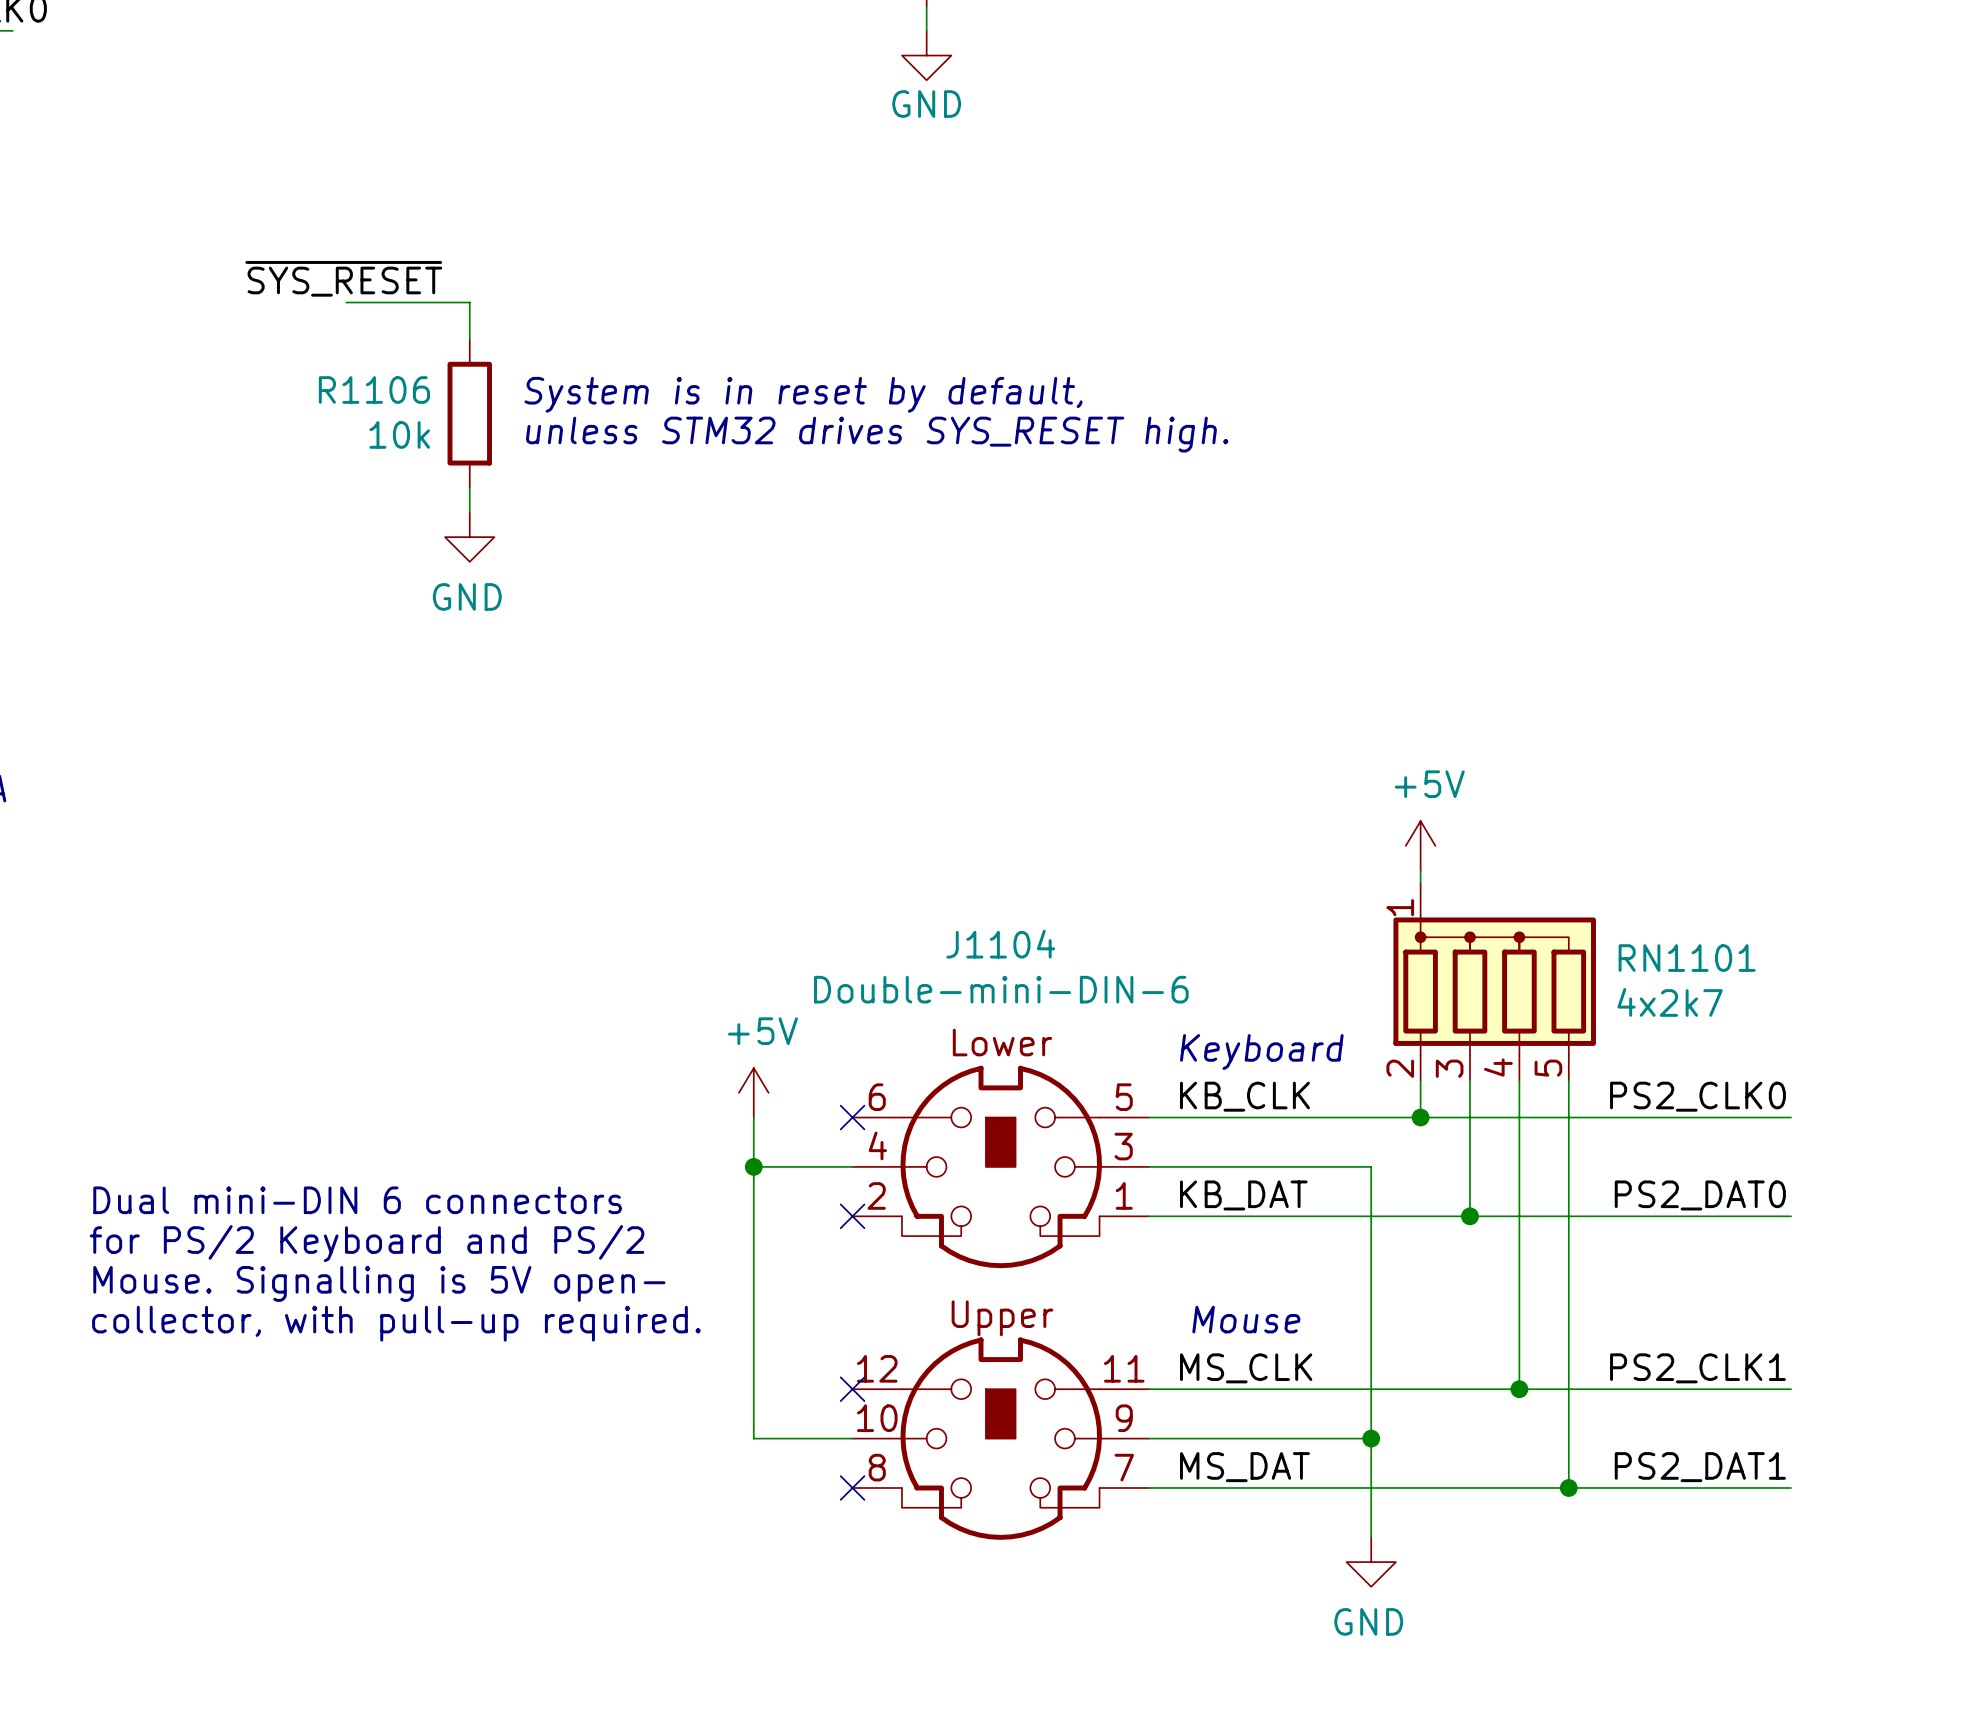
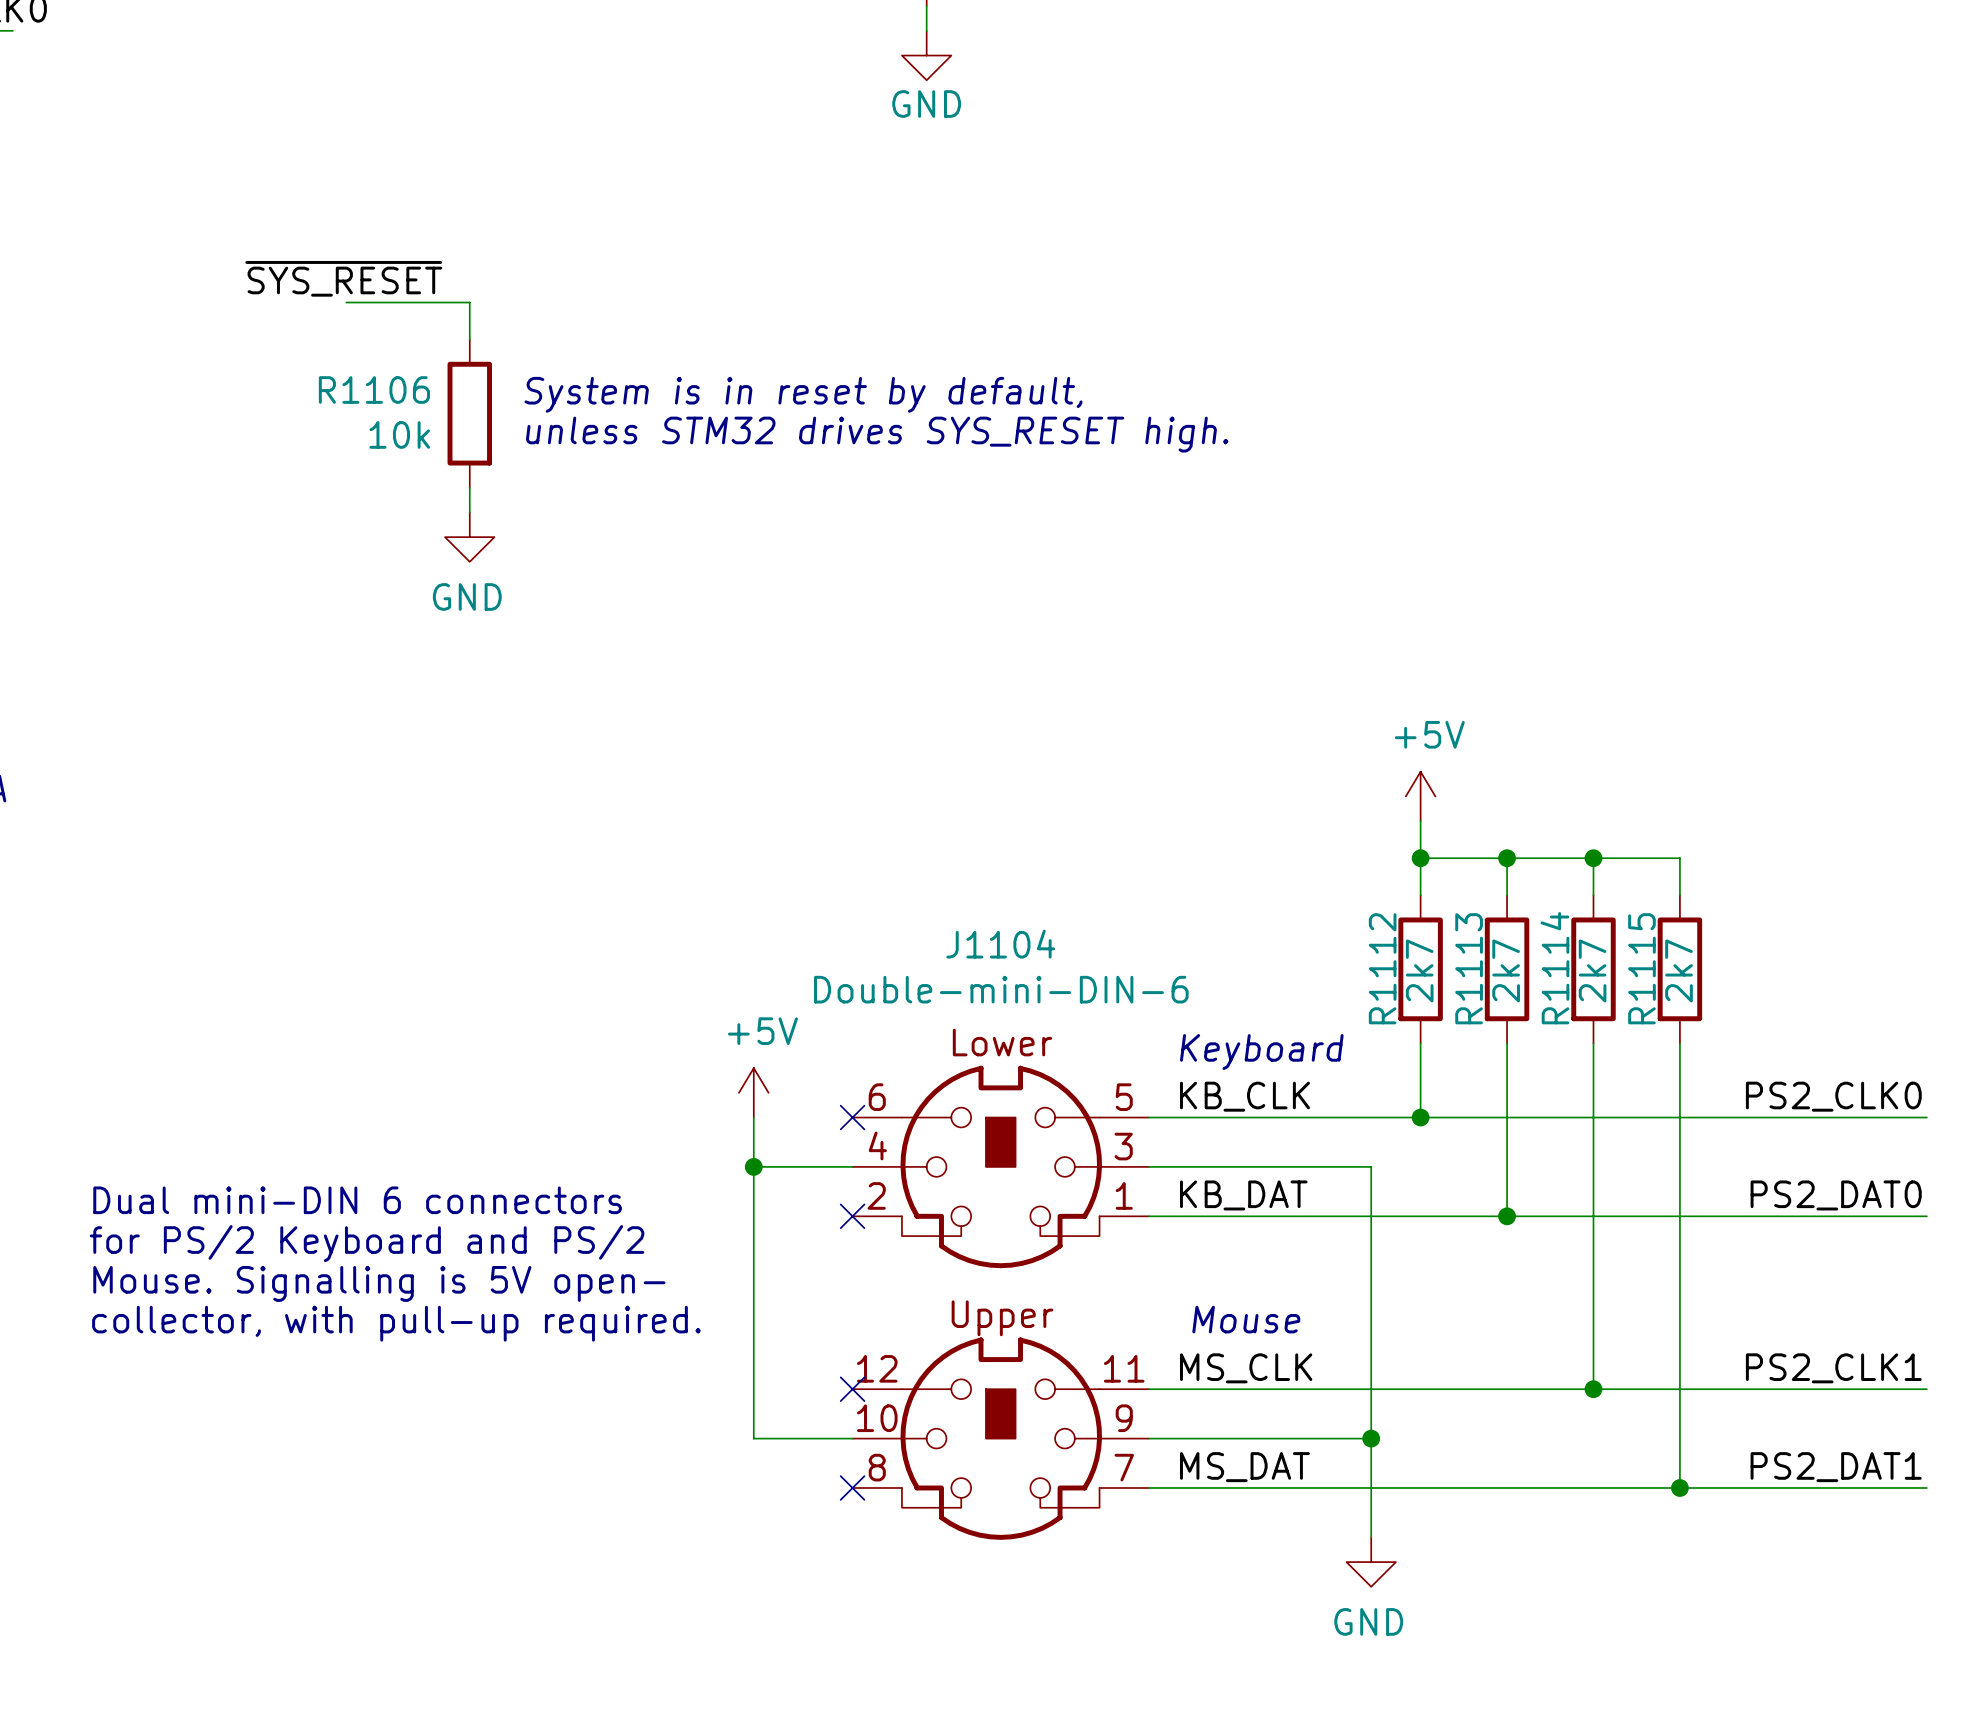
power symbol position: +5V (1420, 845) -> +5V (1420, 796)
wire: none -> (1420, 858) (1679, 858) (1679, 895)
junction: none -> (1420, 858)
wire: none -> (1507, 858) (1507, 895)
junction: none -> (1507, 858)
wire: none -> (1593, 858) (1593, 895)
junction: none -> (1593, 858)
R1112: none -> 2k7 (1420, 969)
R1113: none -> 2k7 (1507, 969)
R1114: none -> 2k7 (1593, 969)
R1115: none -> 2k7 (1679, 969)
RN1101: 4x2k7 (1494, 981) -> none
wire: none -> (1507, 1043) (1507, 1216)
wire: none -> (1593, 1043) (1593, 1389)
wire: none -> (1679, 1043) (1679, 1487)
wire: (1470, 1080) (1470, 1216) -> none
wire: (1519, 1080) (1519, 1389) -> none
wire: (1568, 1080) (1568, 1487) -> none
label position: PS2_CLK0 (1697, 1096) -> PS2_CLK0 (1833, 1096)
wire: none -> (1791, 1117) (1926, 1117)
label position: PS2_DAT0 (1700, 1195) -> PS2_DAT0 (1836, 1195)
junction position: (1470, 1216) -> (1507, 1216)
wire: none -> (1791, 1216) (1926, 1216)
label position: PS2_CLK1 (1697, 1368) -> PS2_CLK1 (1833, 1368)
junction: (1519, 1389) -> none
junction: none -> (1593, 1389)
wire: none -> (1791, 1389) (1926, 1389)
label position: PS2_DAT1 (1700, 1467) -> PS2_DAT1 (1836, 1467)
junction: (1568, 1487) -> none
junction: none -> (1679, 1487)
wire: none -> (1791, 1487) (1926, 1487)

